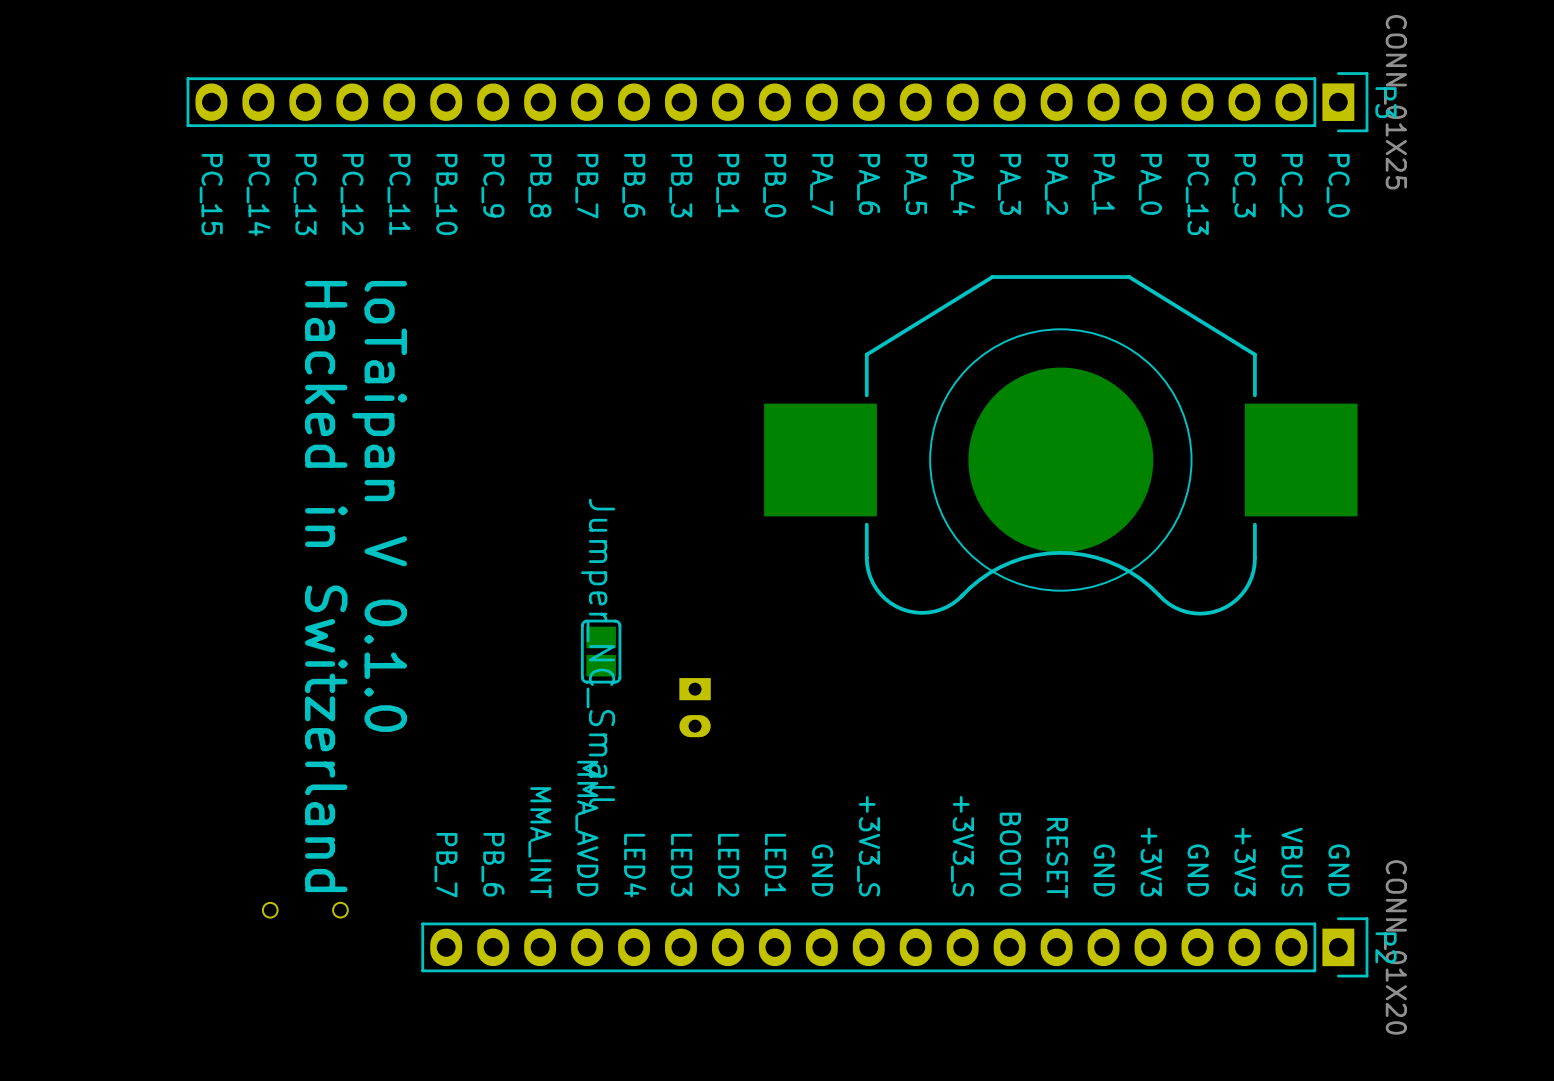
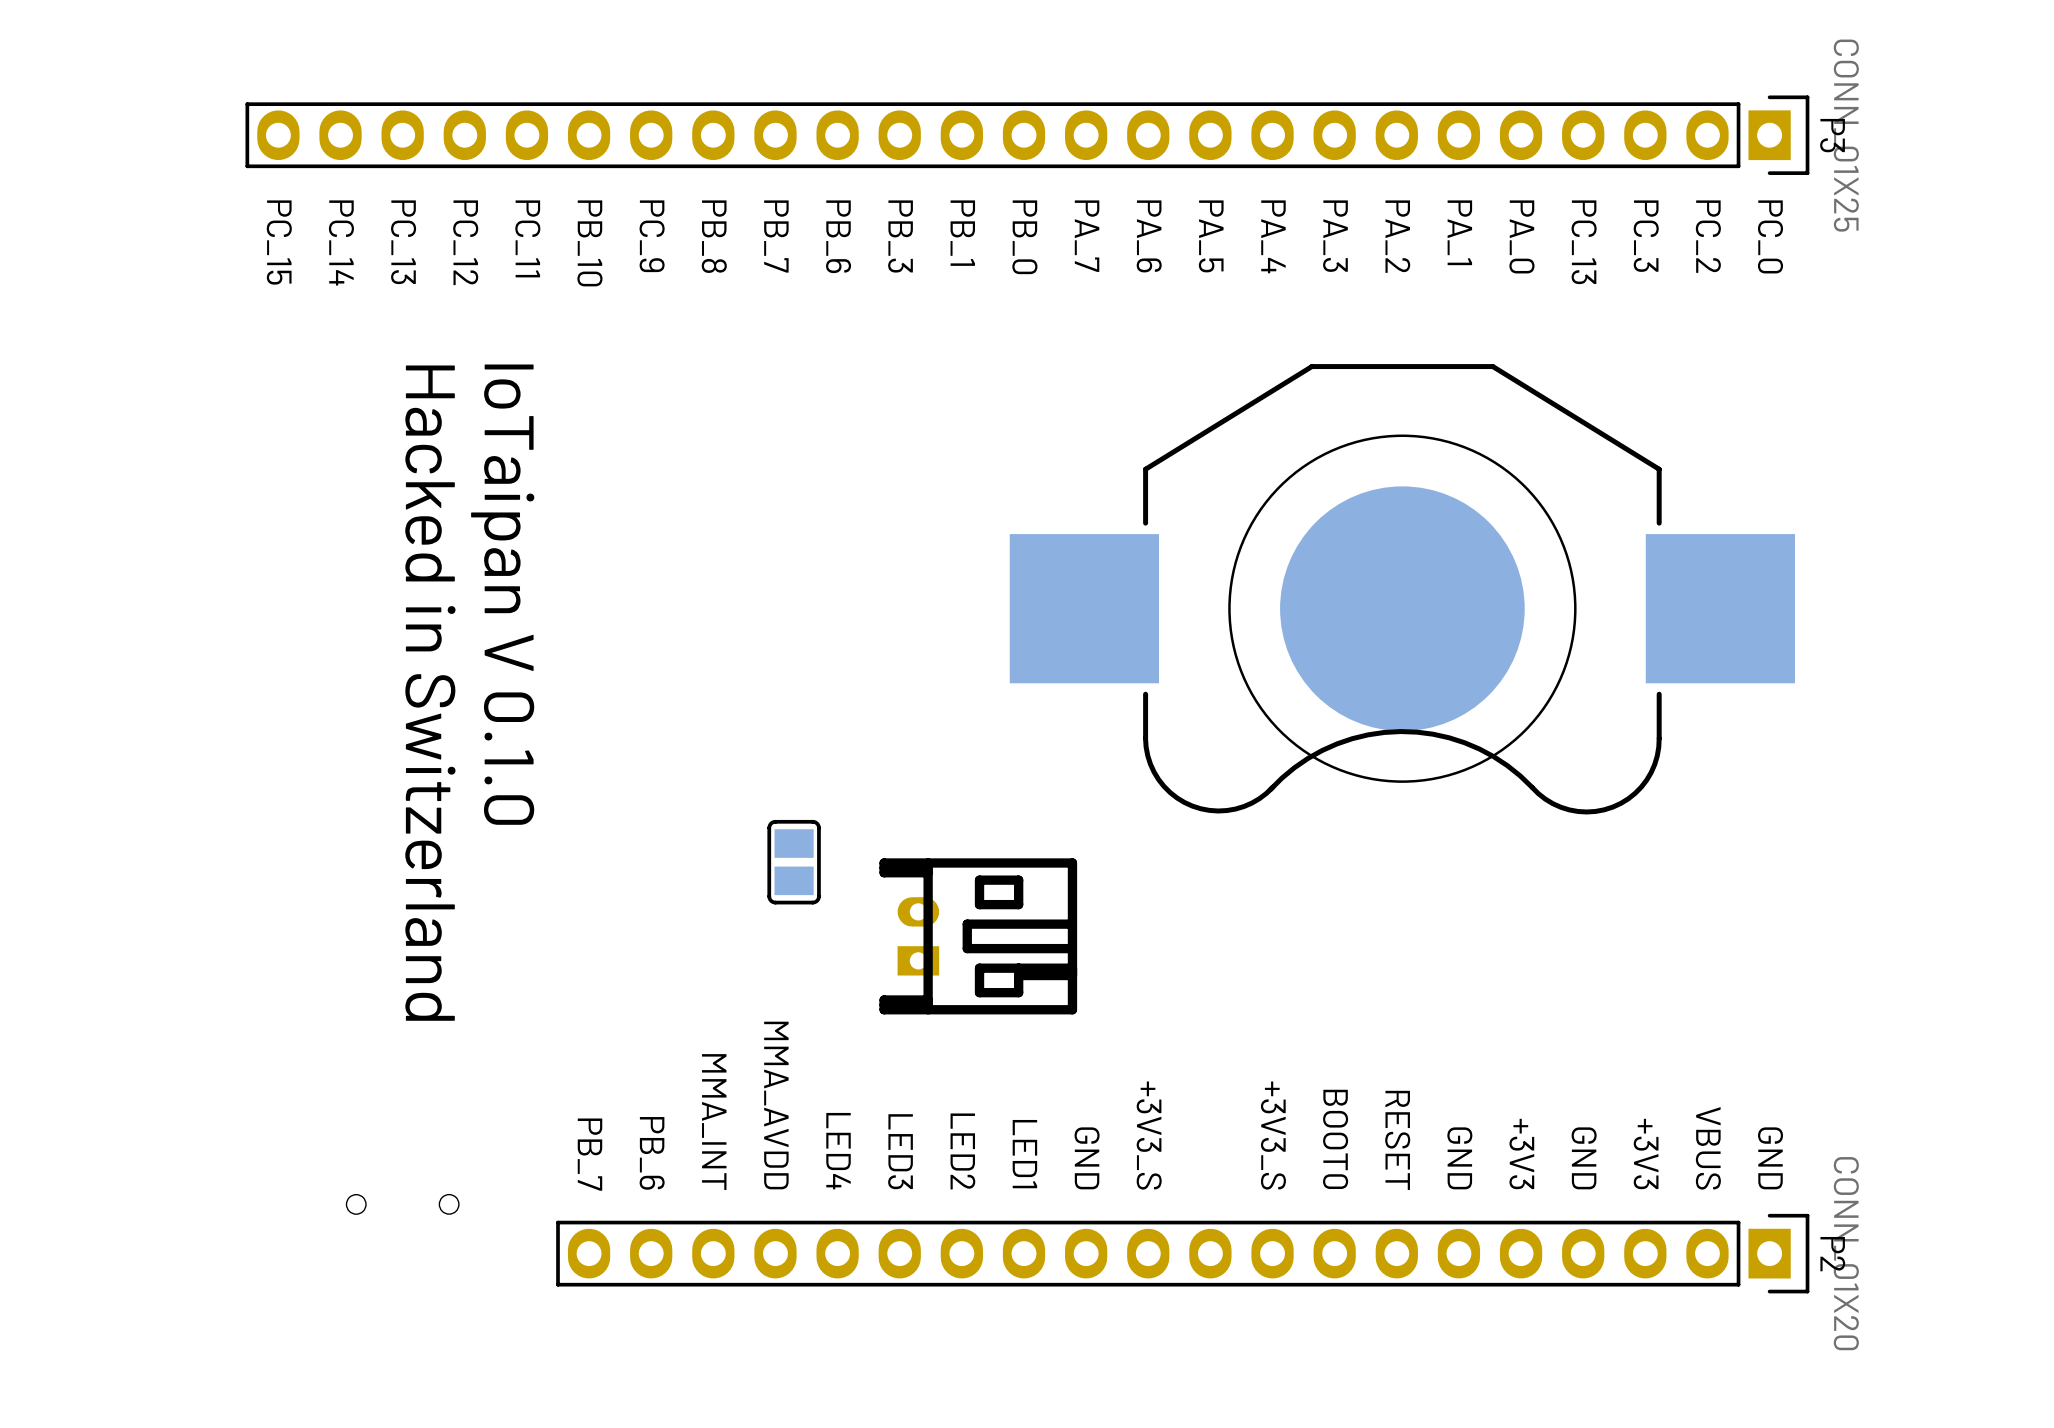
part value: Jumper_NC_Small (598, 651) -> none
part side: top (695, 707) -> bottom (978, 936)

